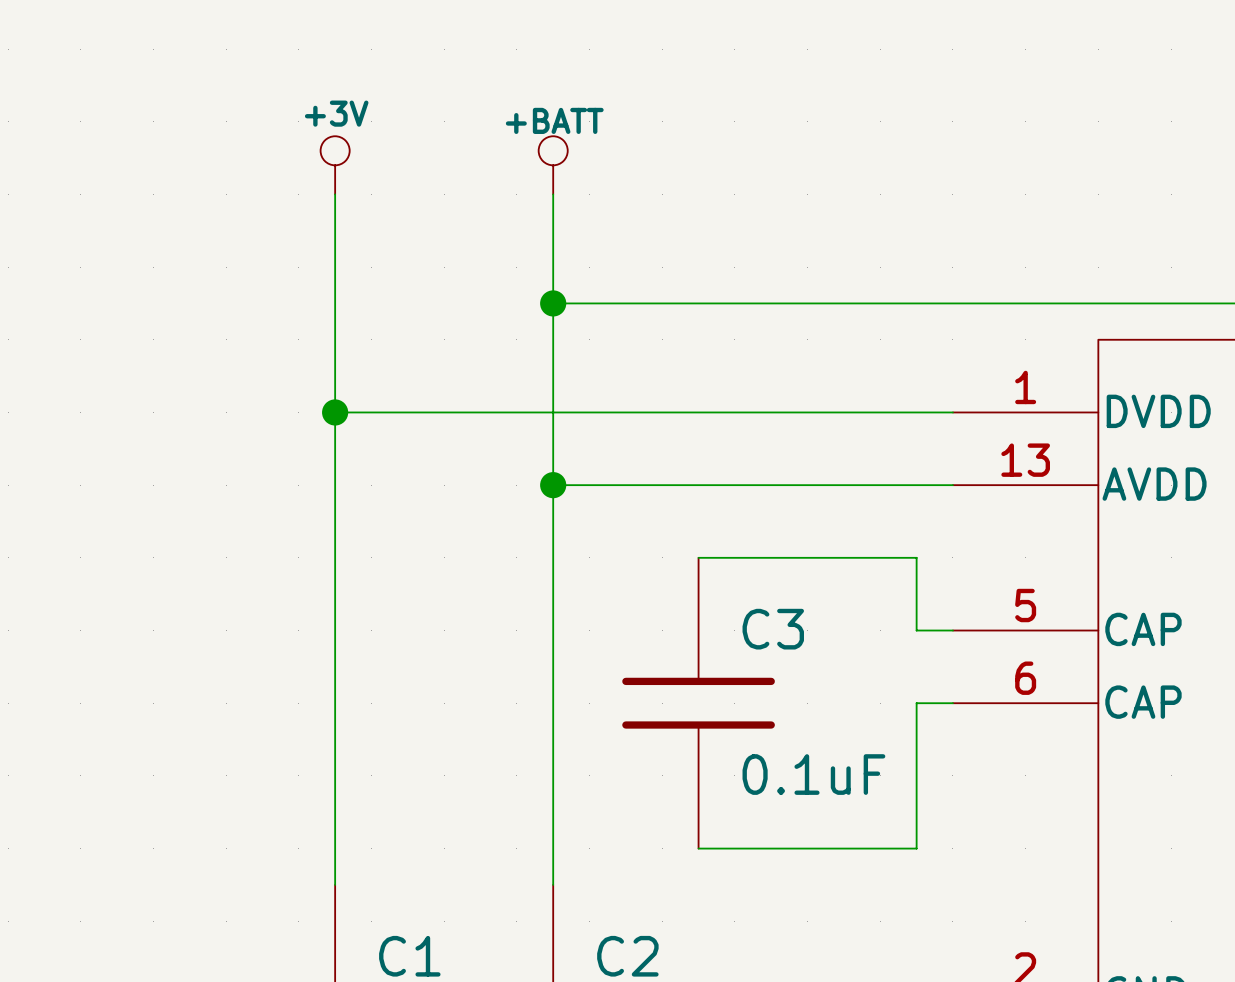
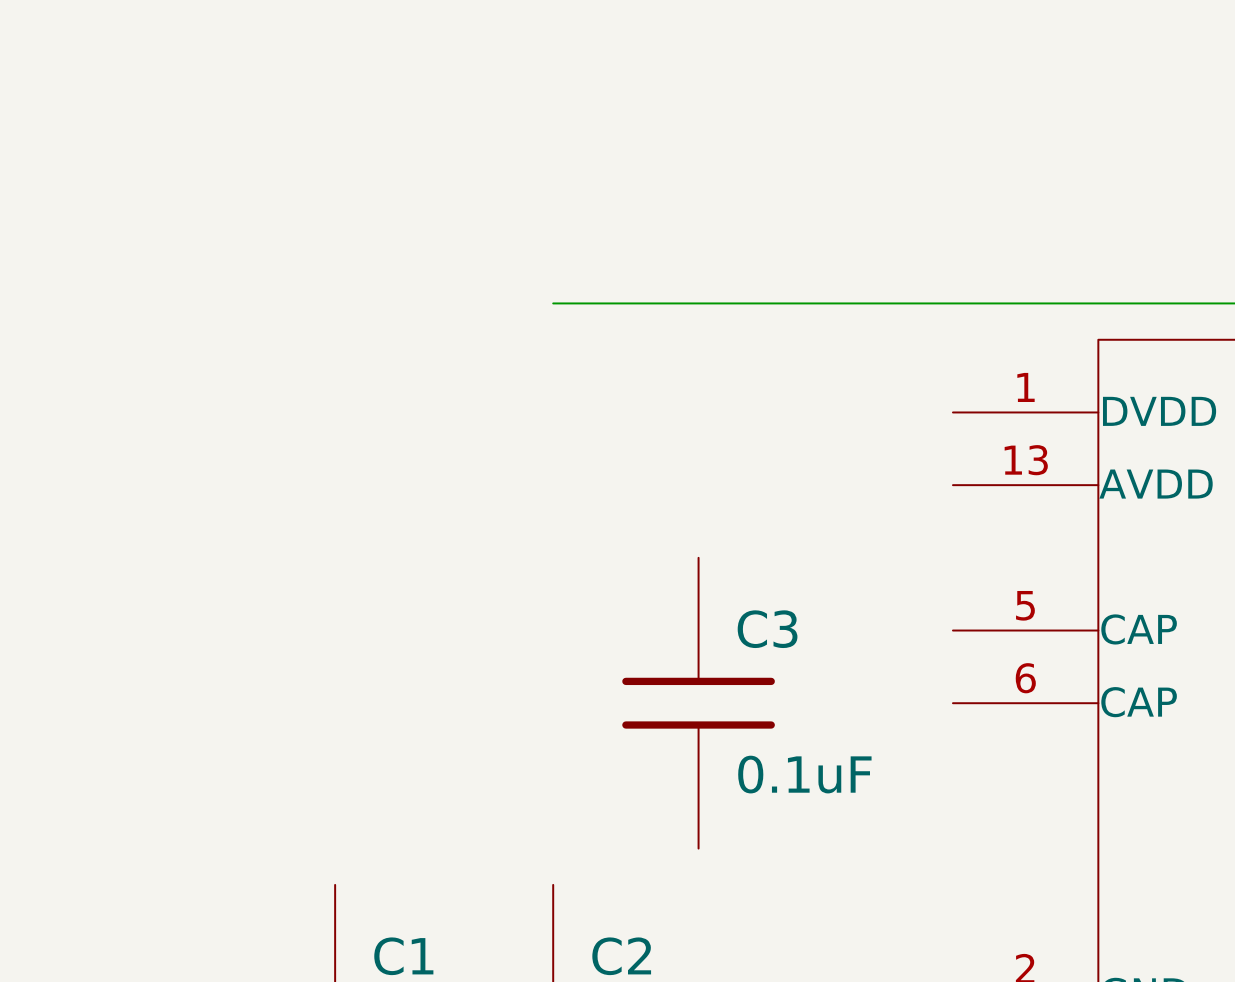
power symbol: +3V (335, 165) -> none
power symbol: +BATT (553, 165) -> none
wire: (335, 194) (335, 884) -> none
wire: (553, 194) (553, 884) -> none
junction: (553, 303) -> none
wire: (335, 412) (952, 412) -> none
junction: (335, 412) -> none
wire: (553, 485) (952, 485) -> none
junction: (553, 485) -> none
wire: (698, 557) (916, 557) (916, 630) (952, 630) -> none
wire: (952, 703) (916, 703) (916, 848) (698, 848) -> none

